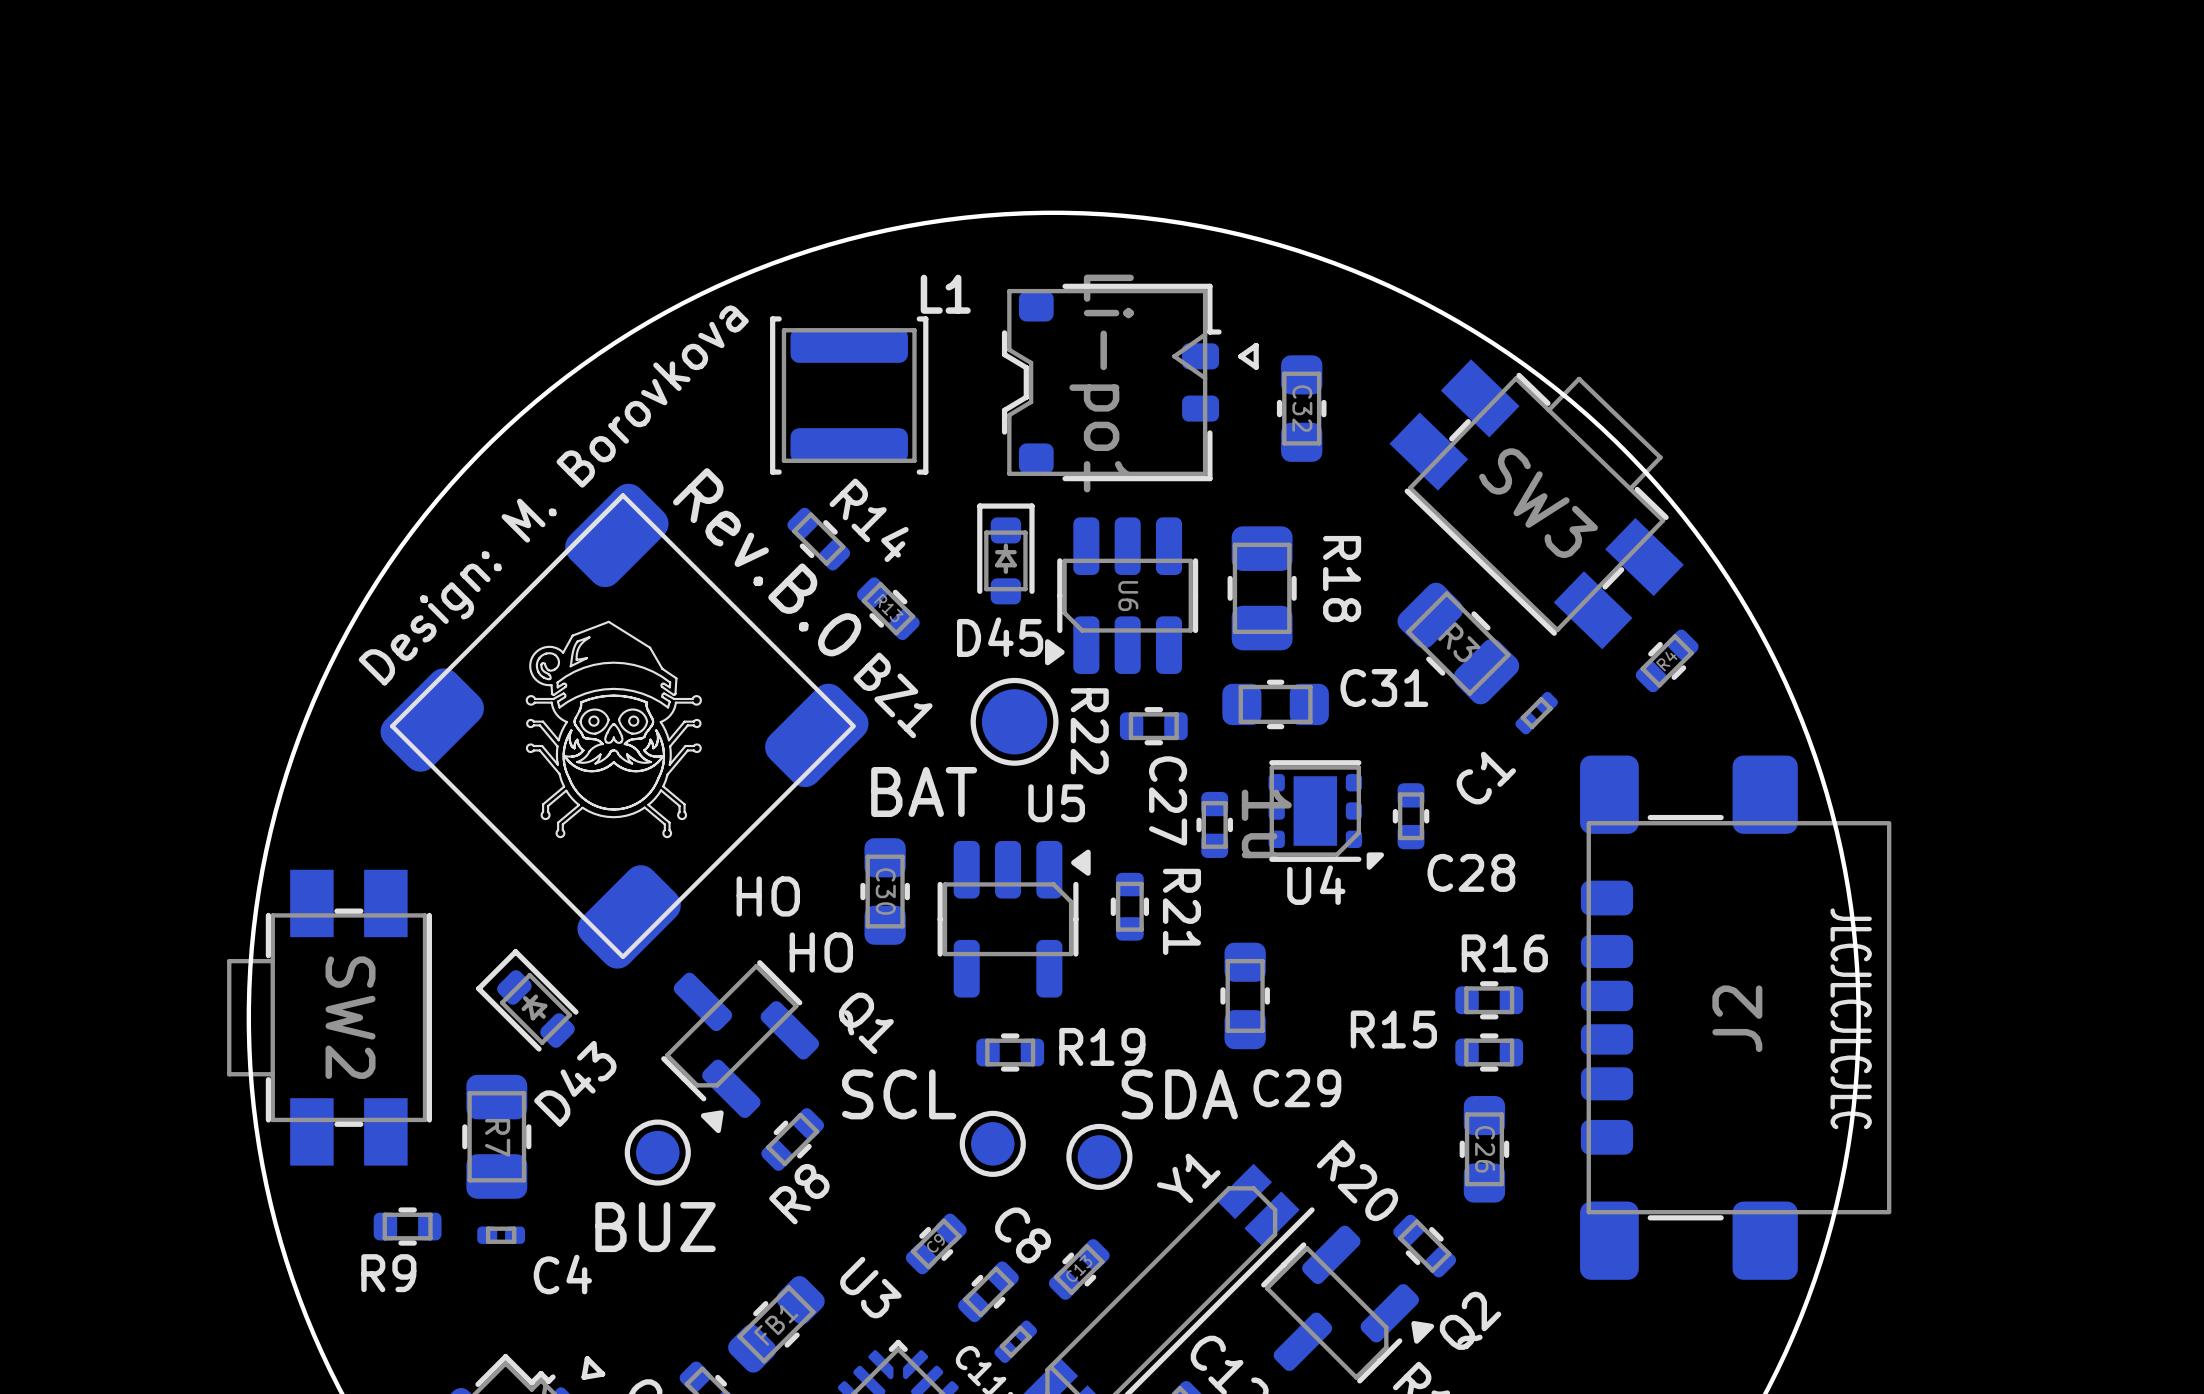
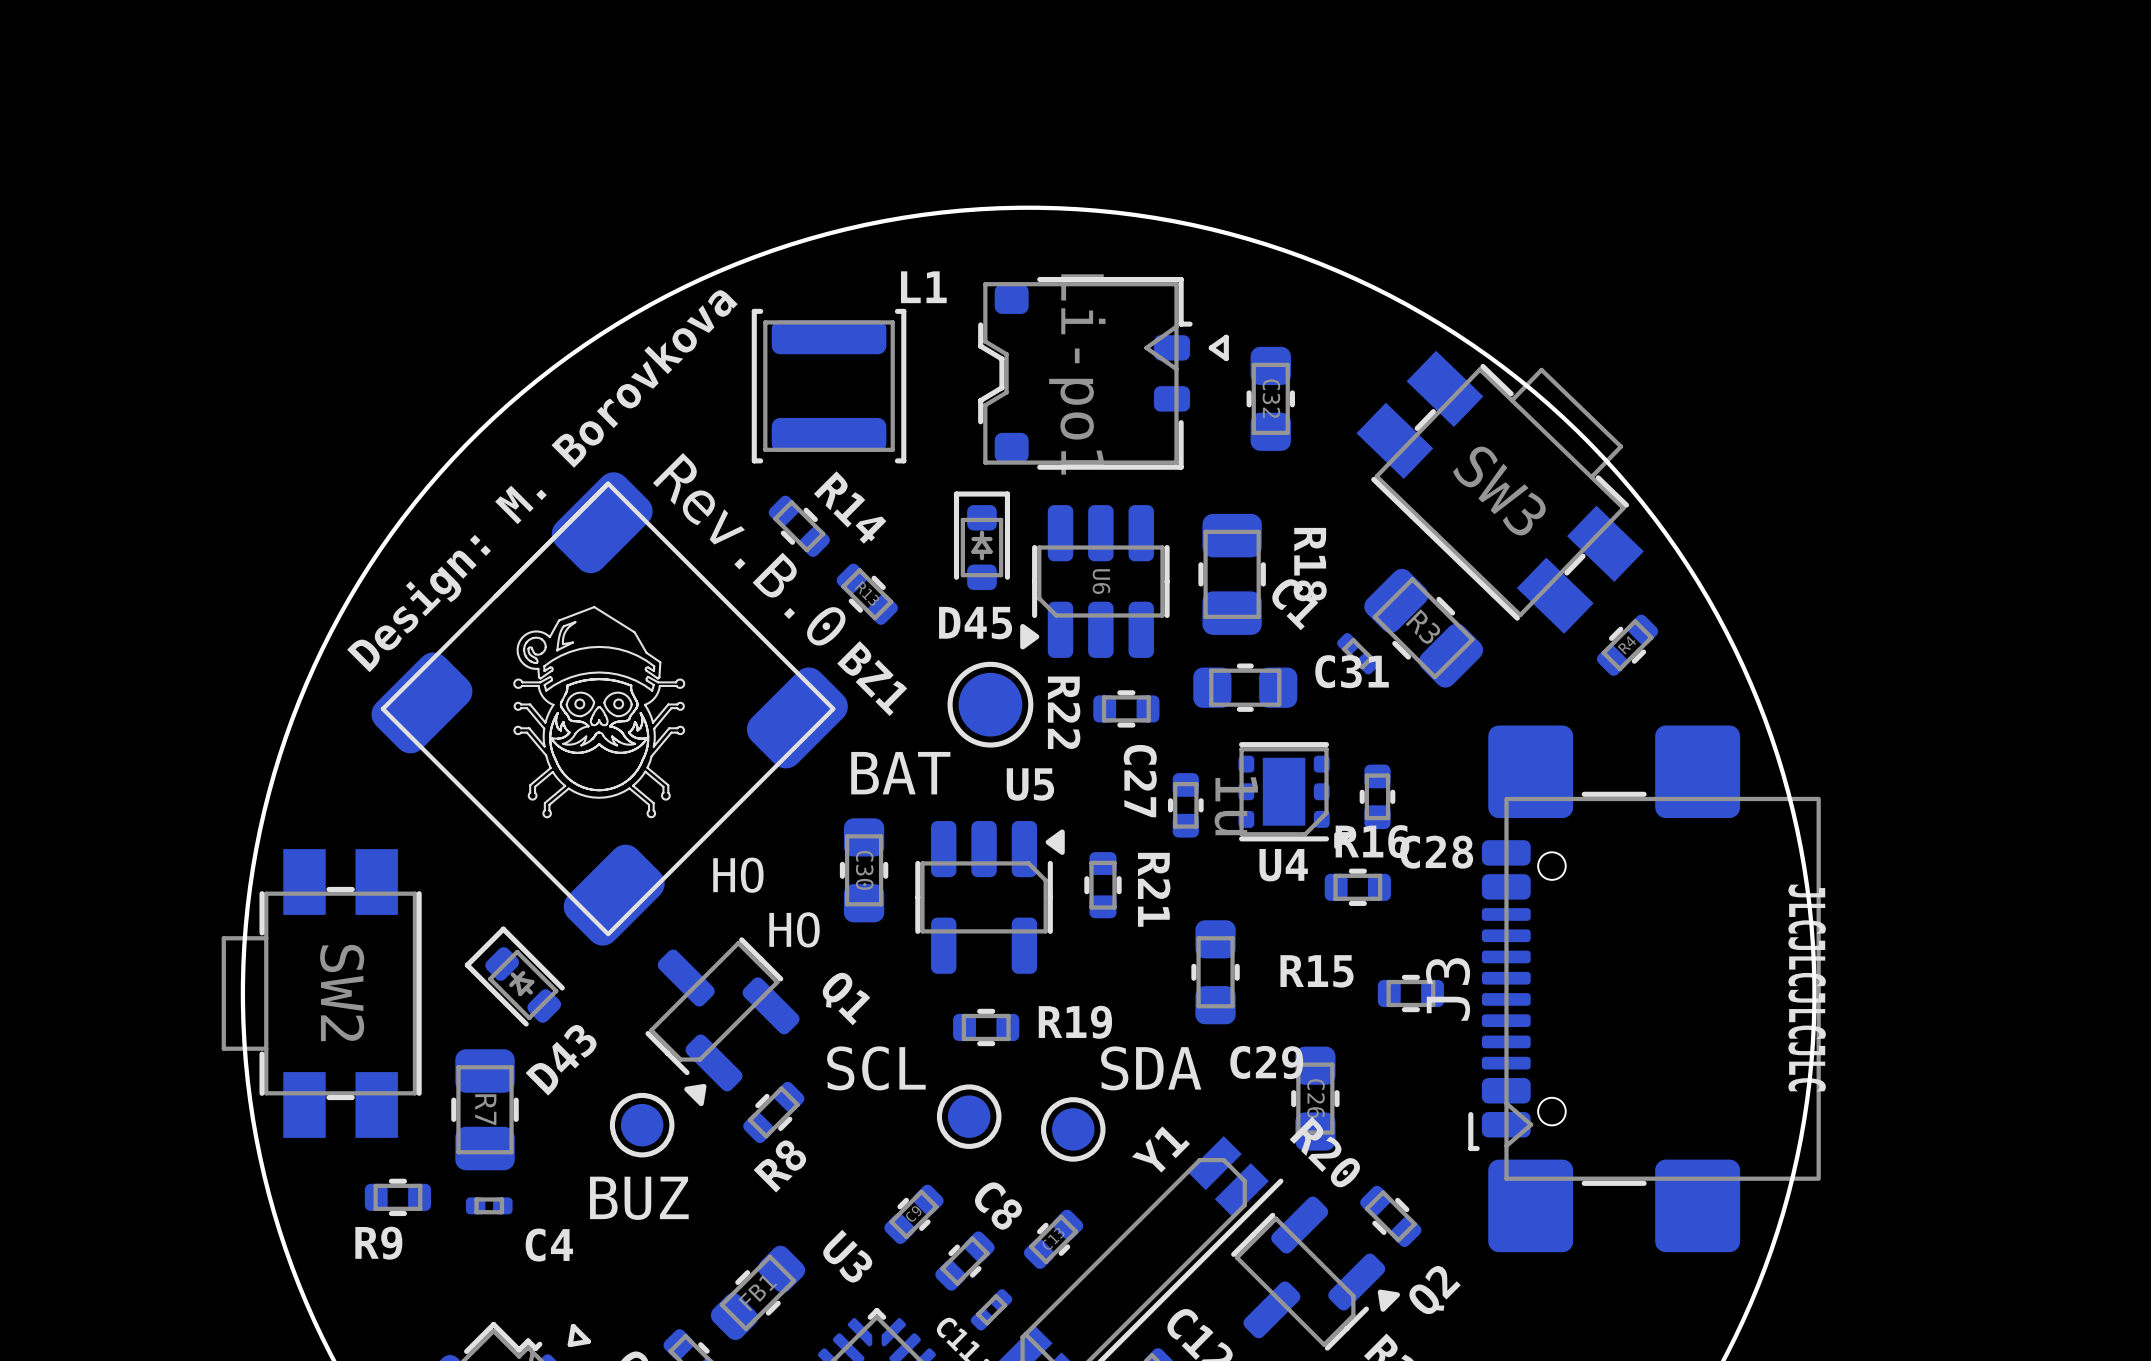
C1 rotation: 0° (1536, 713) -> 90° clockwise (1357, 653)
C1 position: (1536, 713) -> (1357, 653)
R16 position: (1489, 1000) -> (1357, 887)
J3: none -> (1644, 988)
J2: (1735, 1017) -> none
R15 position: (1489, 1052) -> (1410, 993)
C26 position: (1484, 1149) -> (1315, 1098)

